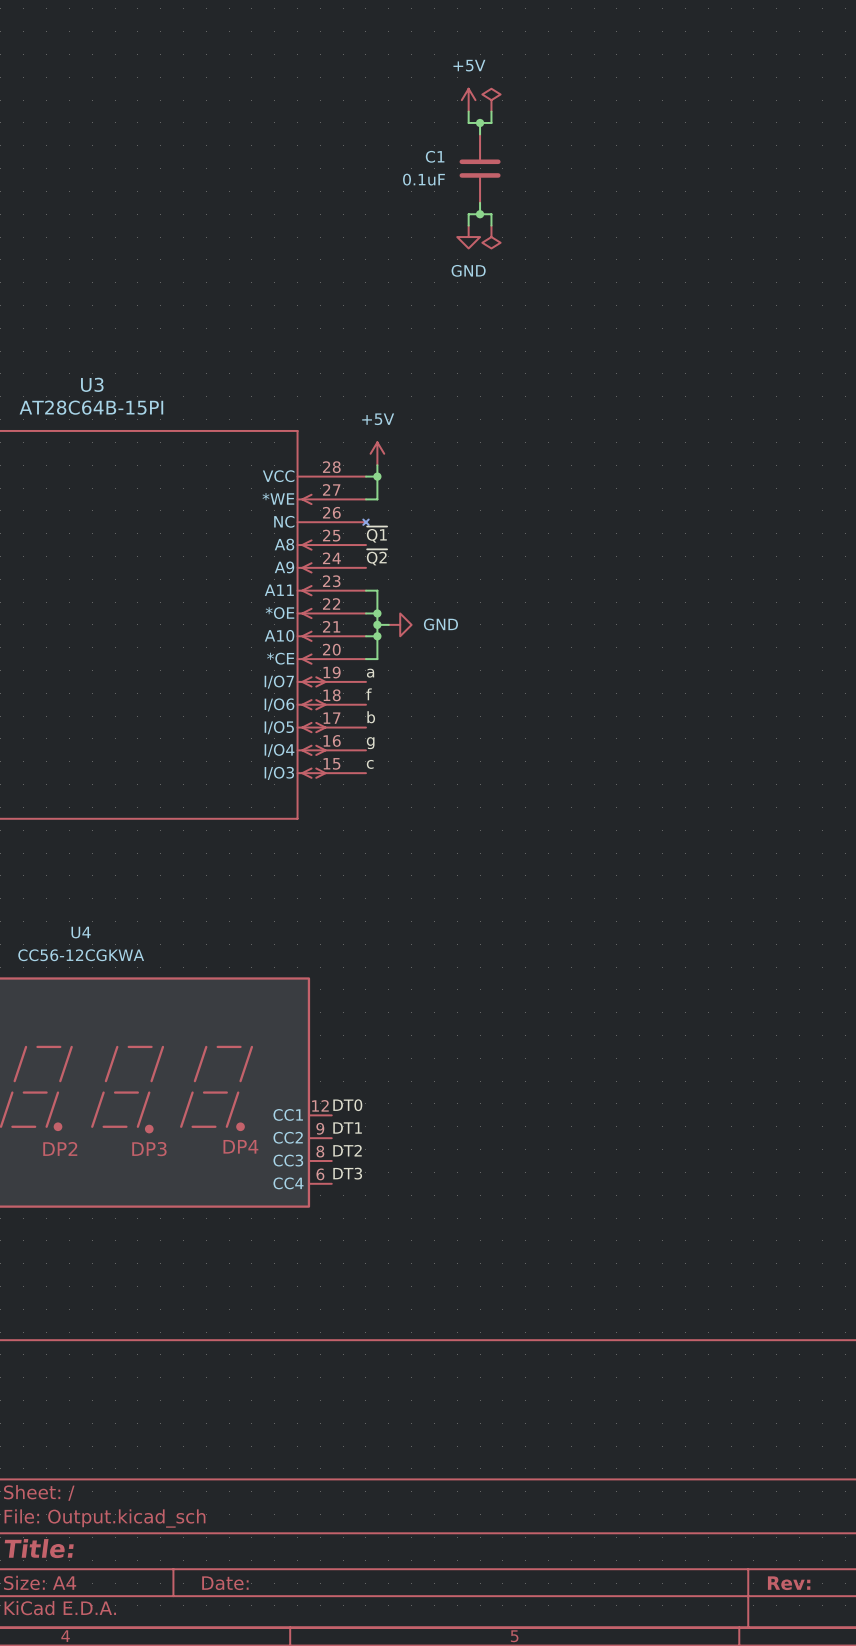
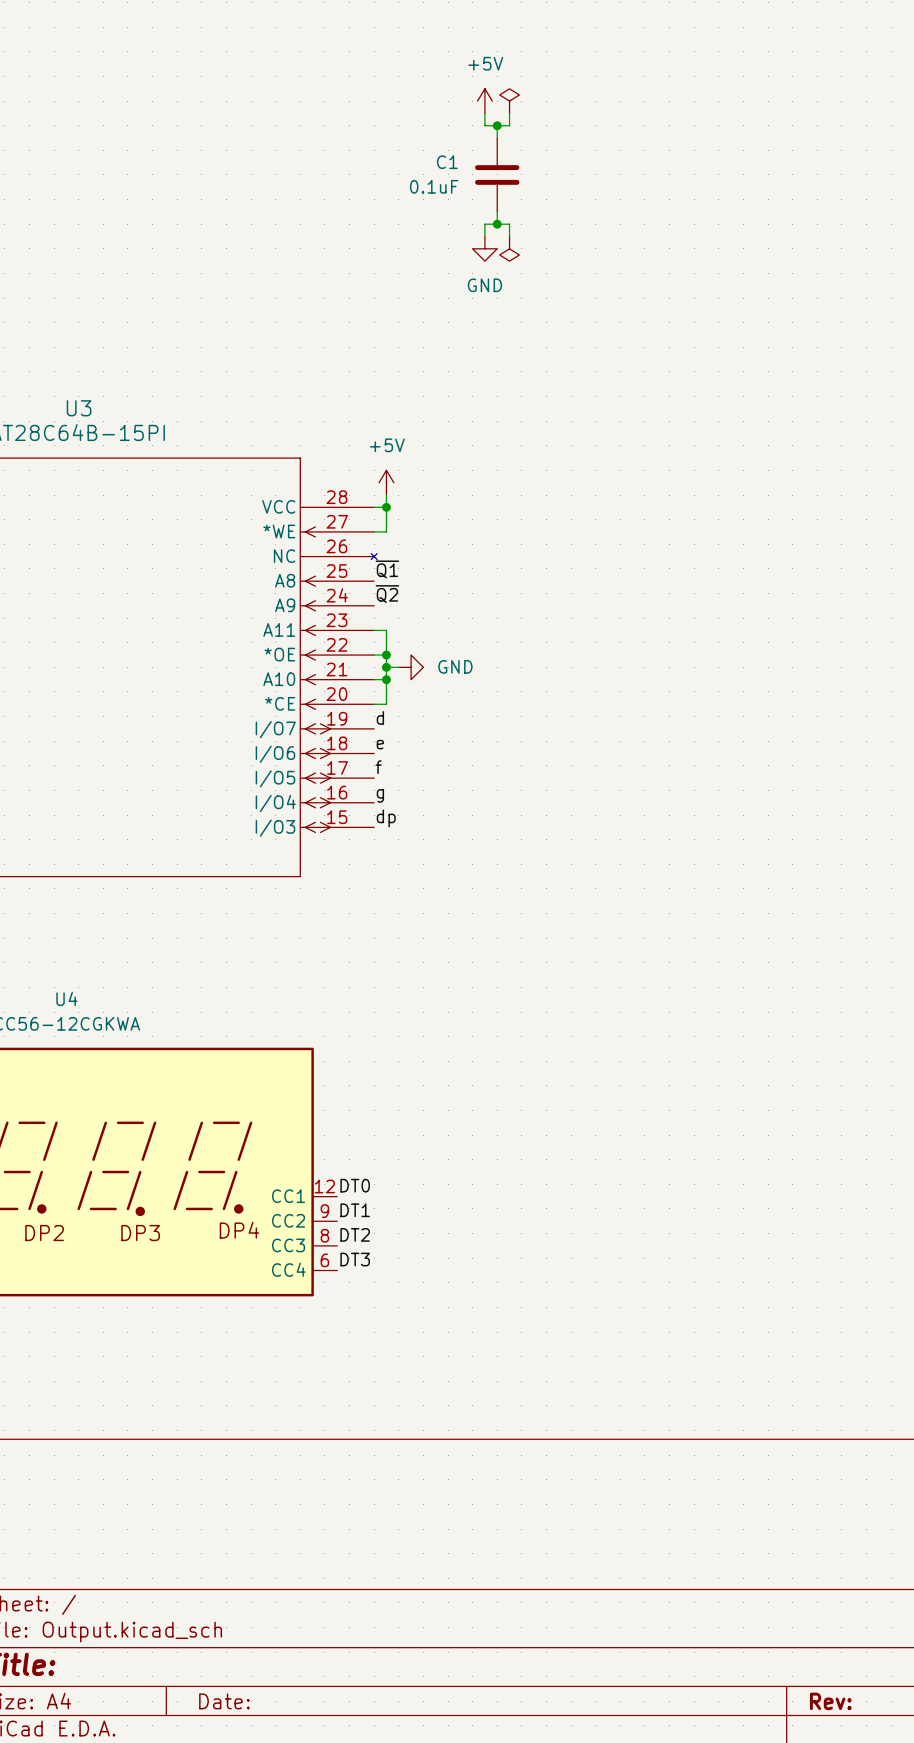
label: a (370, 673) -> d (380, 717)
label: f (369, 694) -> e (380, 744)
label: b (371, 717) -> f (378, 767)
label: c (370, 764) -> dp (386, 818)

